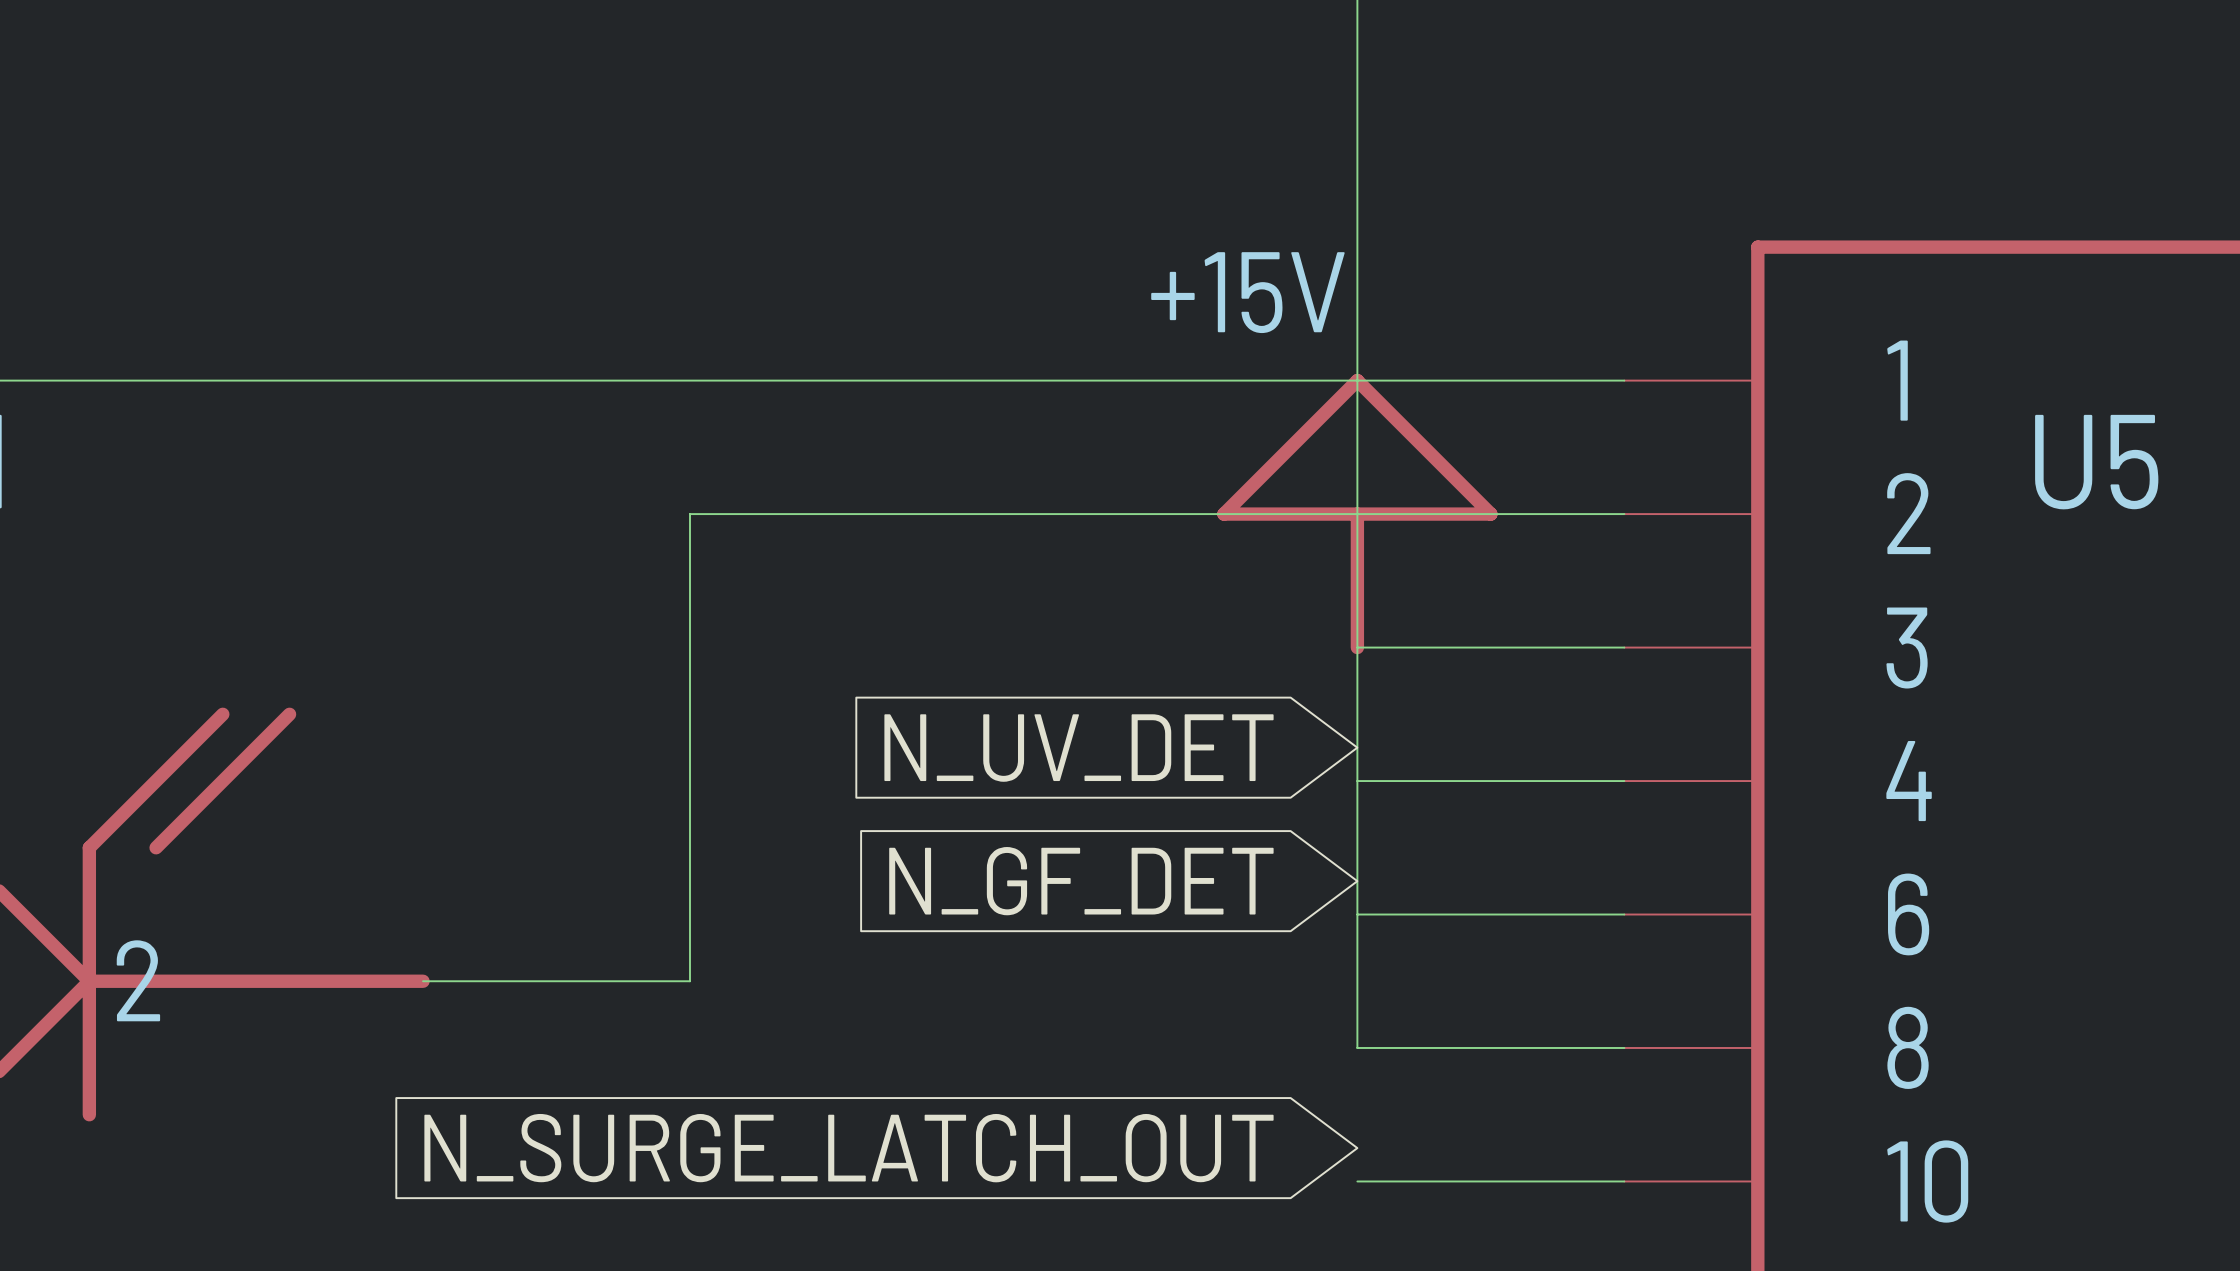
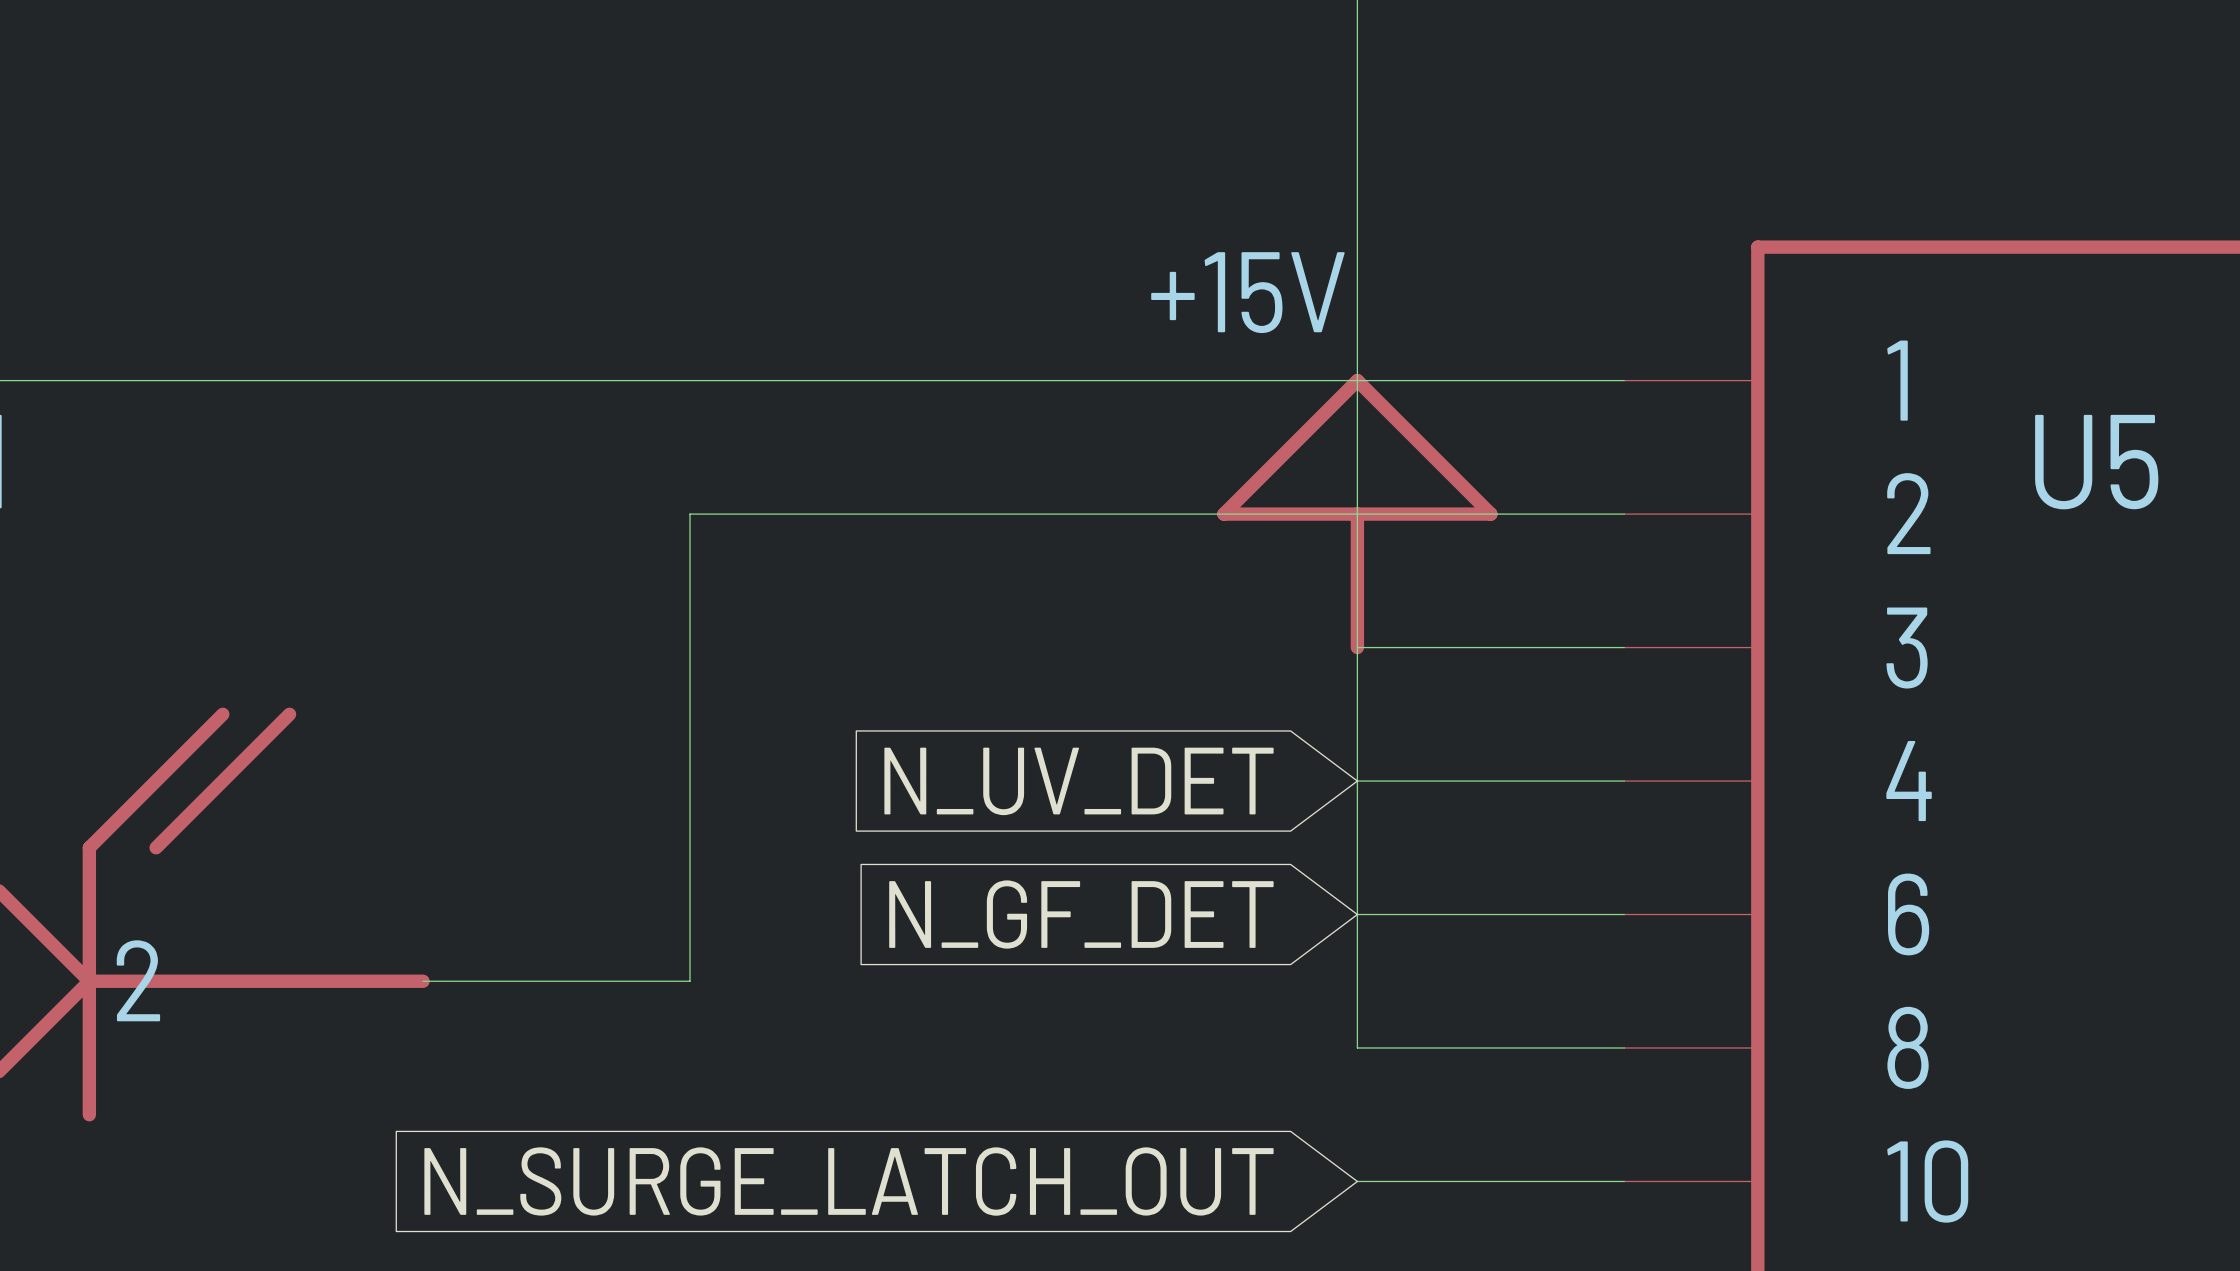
global label position: N_UV_DET (1079, 748) -> N_UV_DET (1079, 781)
global label position: N_GF_DET (1081, 881) -> N_GF_DET (1081, 914)
global label position: N_SURGE_LATCH_OUT (848, 1148) -> N_SURGE_LATCH_OUT (848, 1181)

